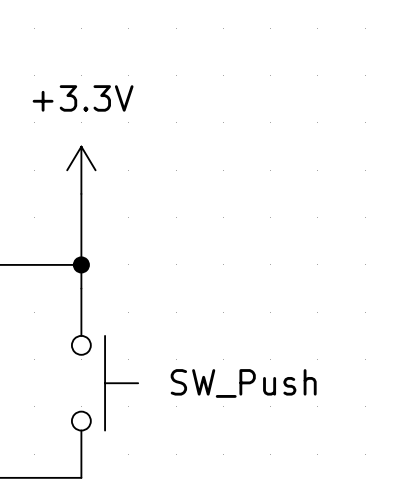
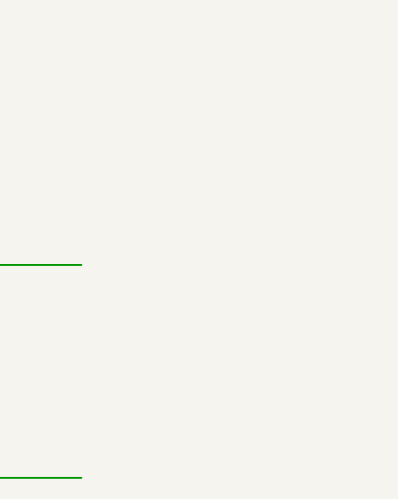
power symbol: +3.3V (81, 170) -> none
wire: (81, 193) (81, 288) -> none
junction: (81, 264) -> none
part: SW_Push (105, 383) -> none

